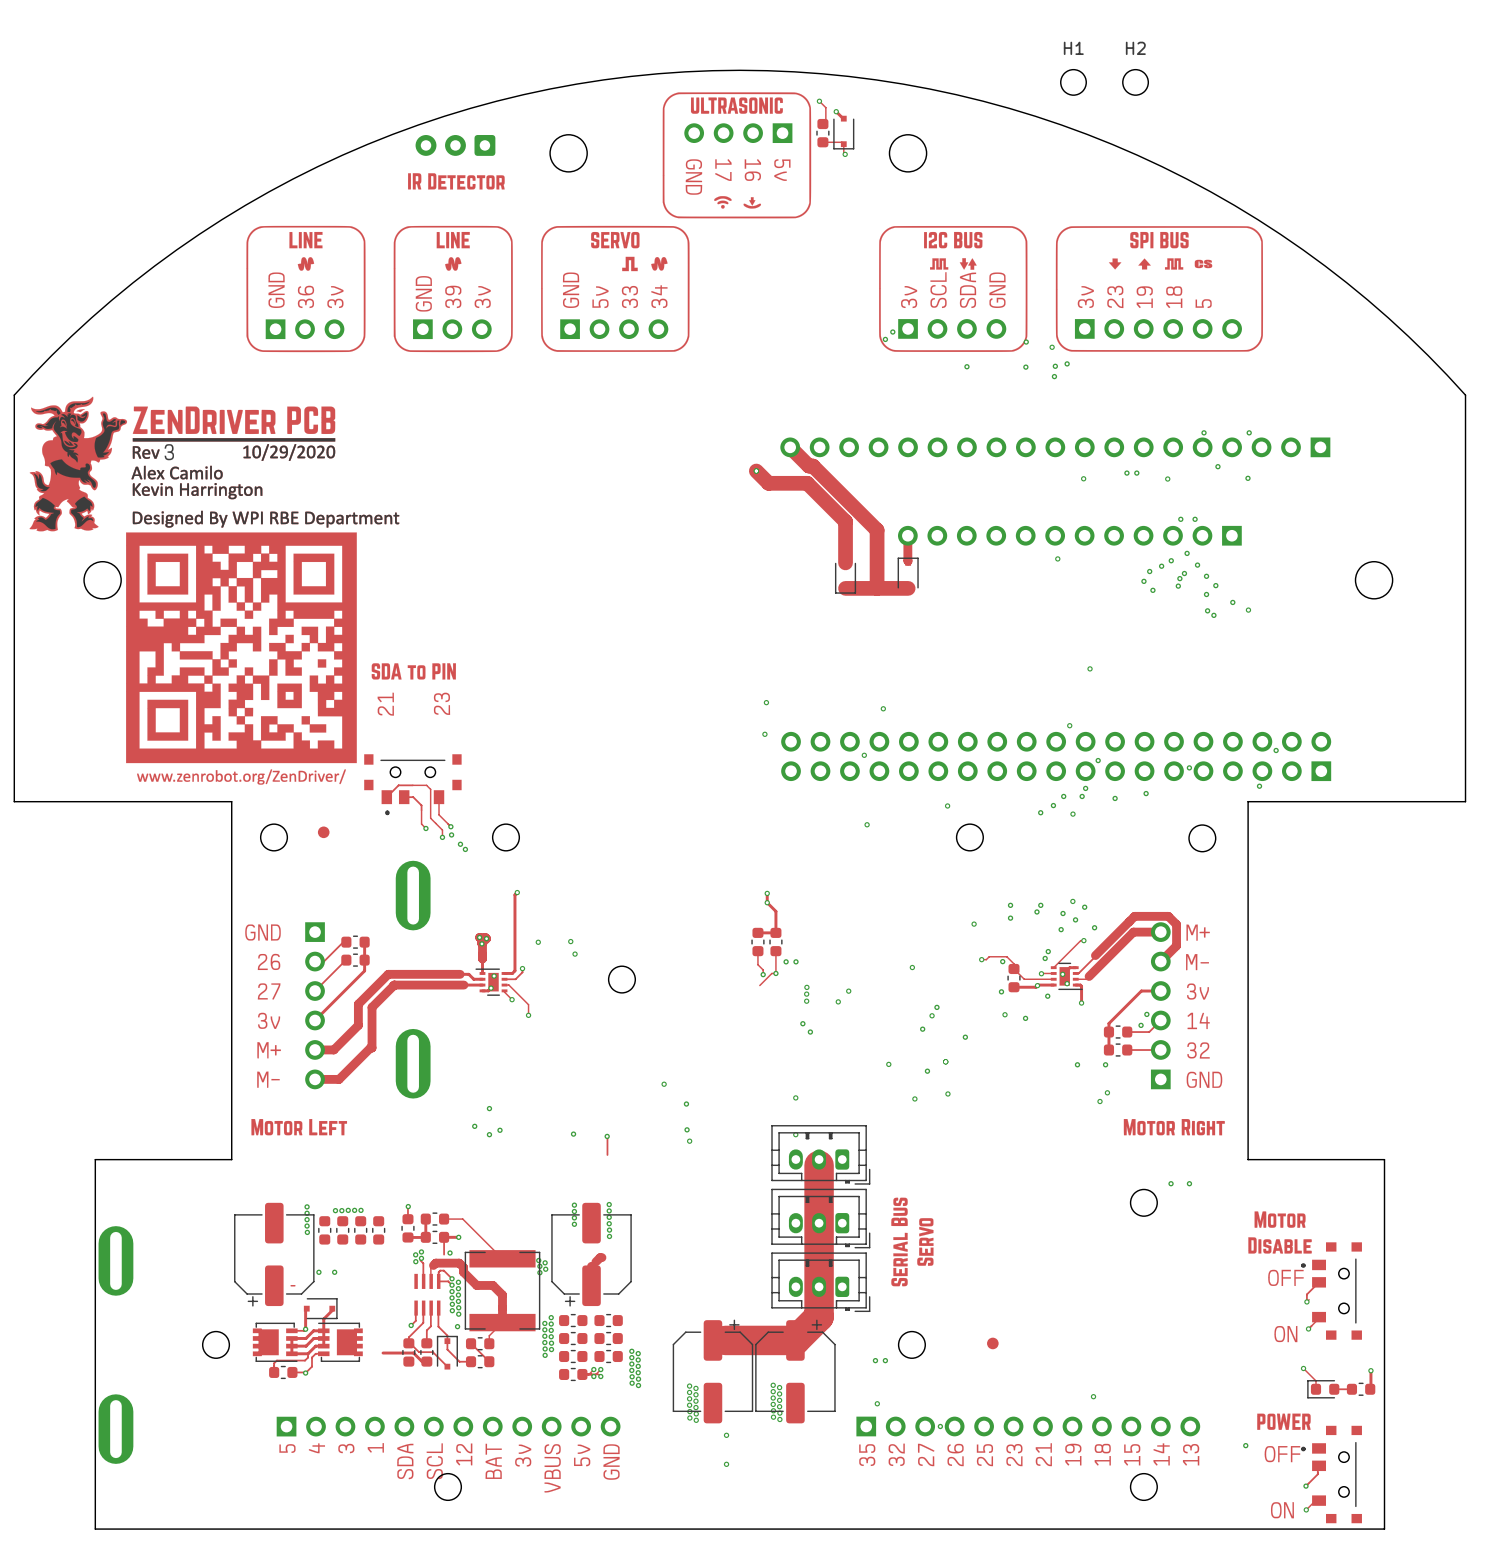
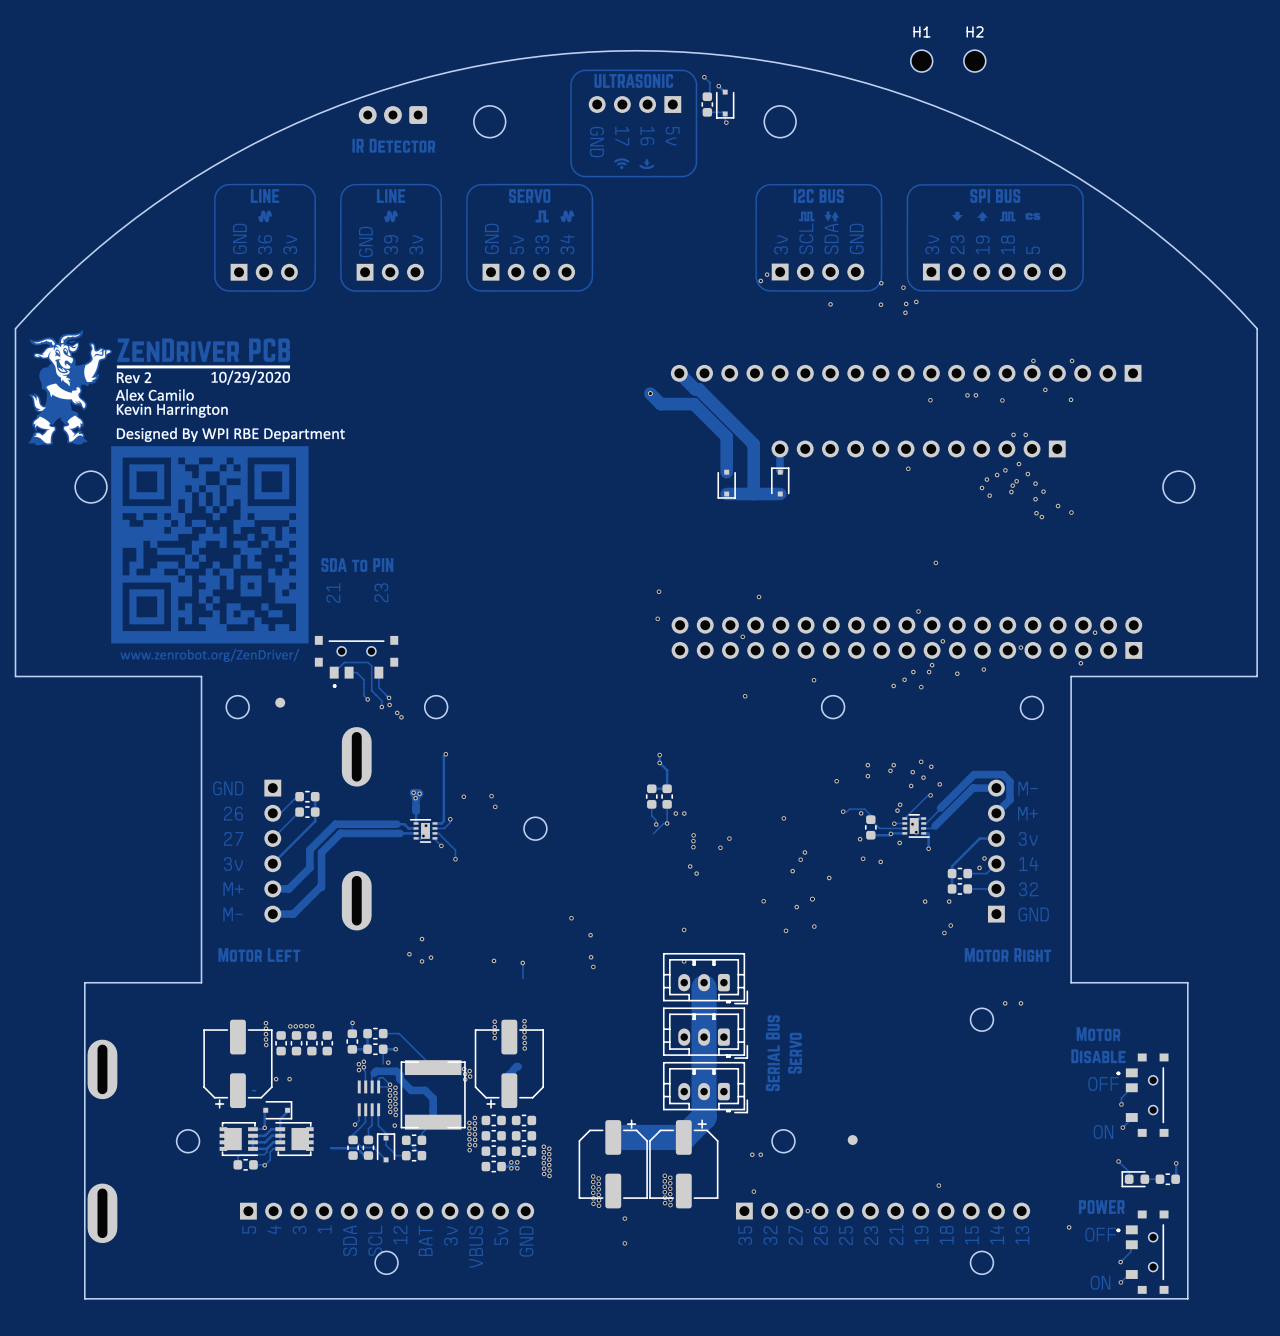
drawing shape: [29, 92, 1312, 1519] -> [28, 69, 1126, 1290]

